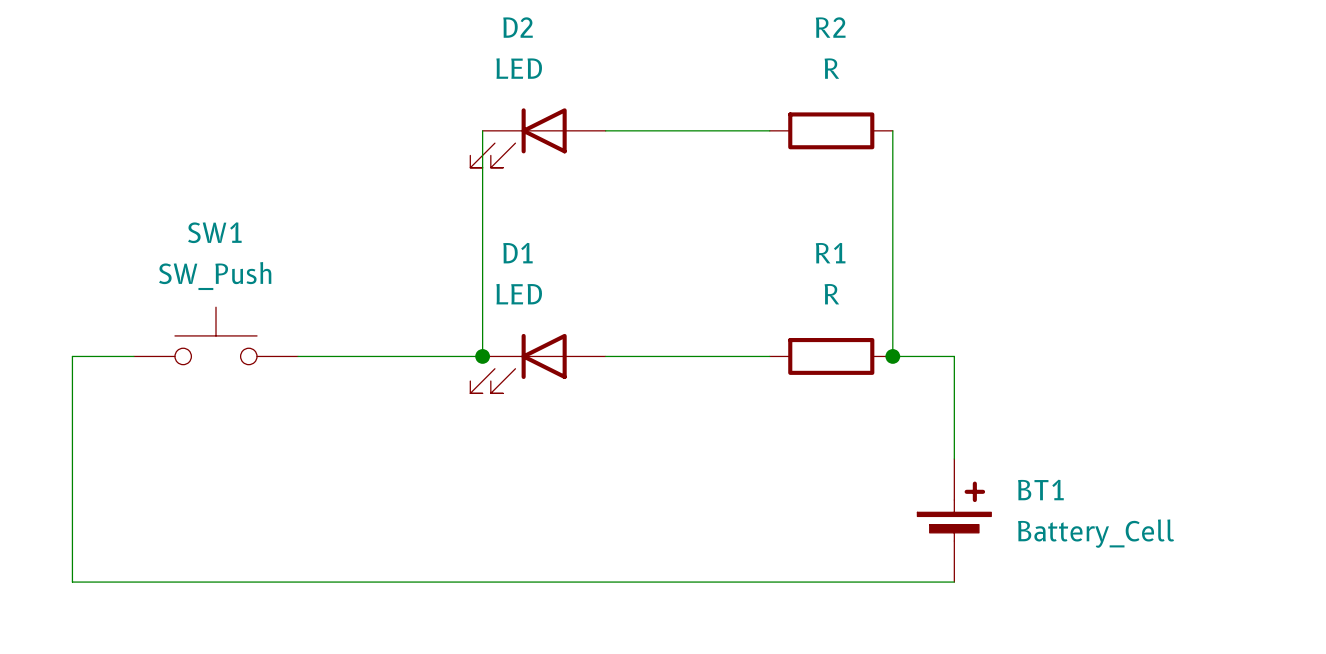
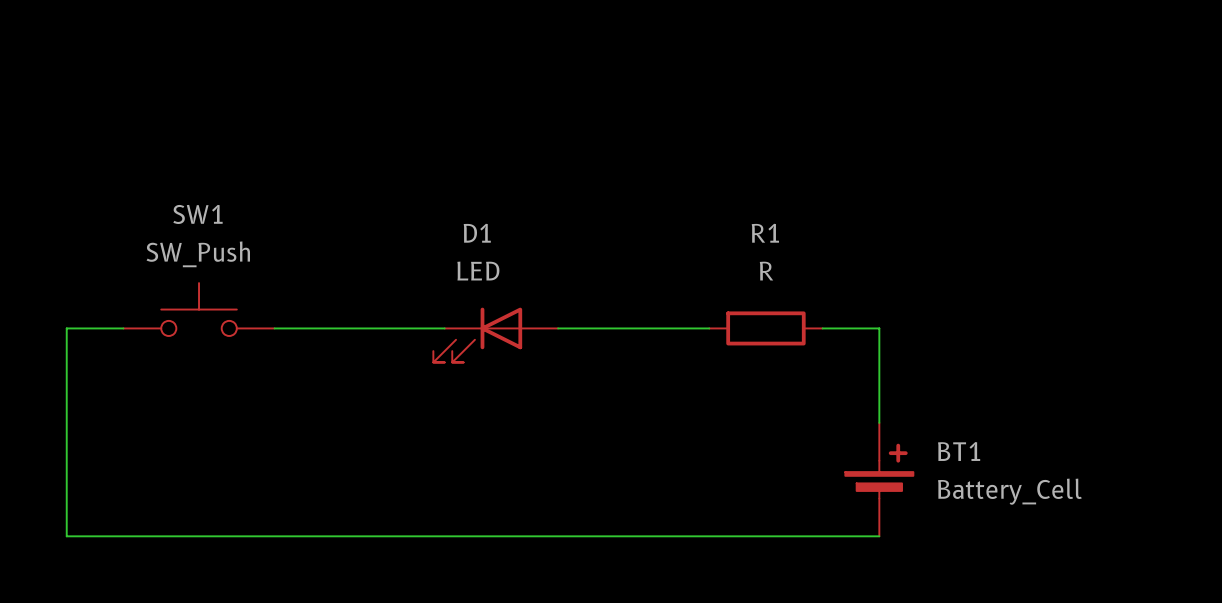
wire: (482, 130) (482, 356) -> none
wire: (605, 130) (769, 130) -> none
R2: R (831, 130) -> none
wire: (892, 130) (892, 356) -> none
D2: LED (537, 138) -> none
junction: (482, 356) -> none
junction: (892, 356) -> none

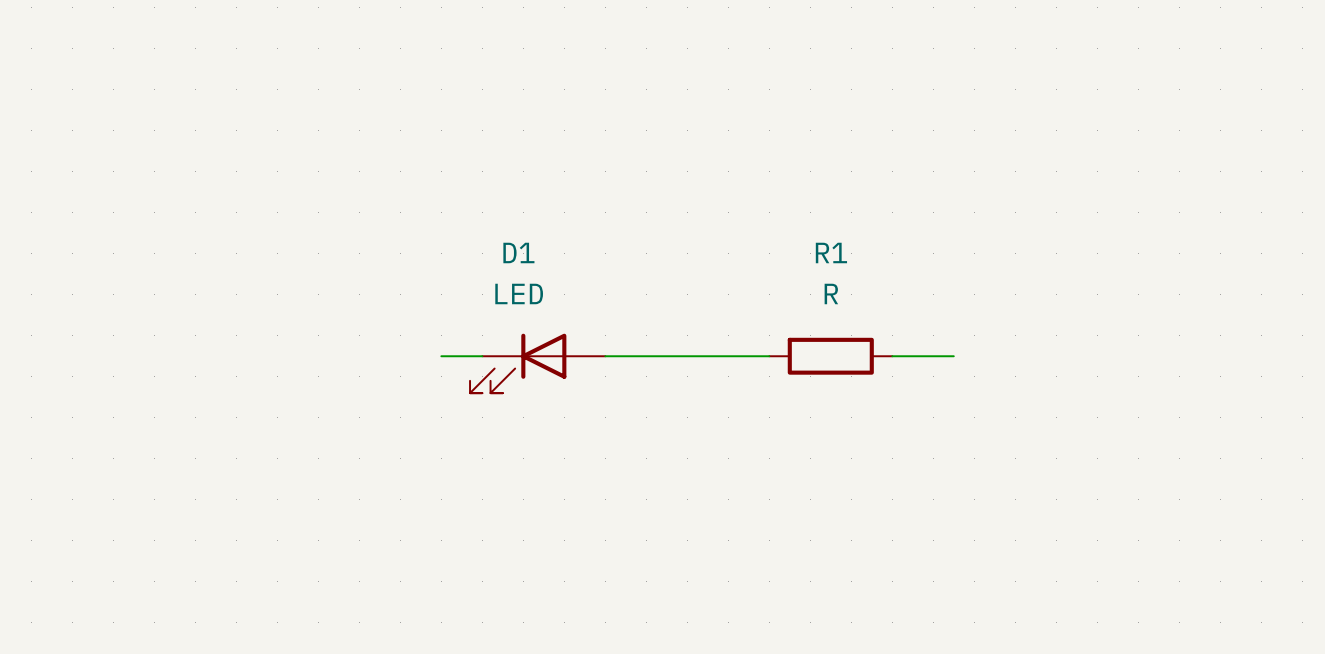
SW1: SW_Push (199, 309) -> none
wire: (123, 328) (66, 328) (66, 536) (879, 536) -> none
wire: (274, 328) (406, 328) -> none
wire: (879, 328) (879, 422) -> none
BT1: Battery_Cell (879, 479) -> none

